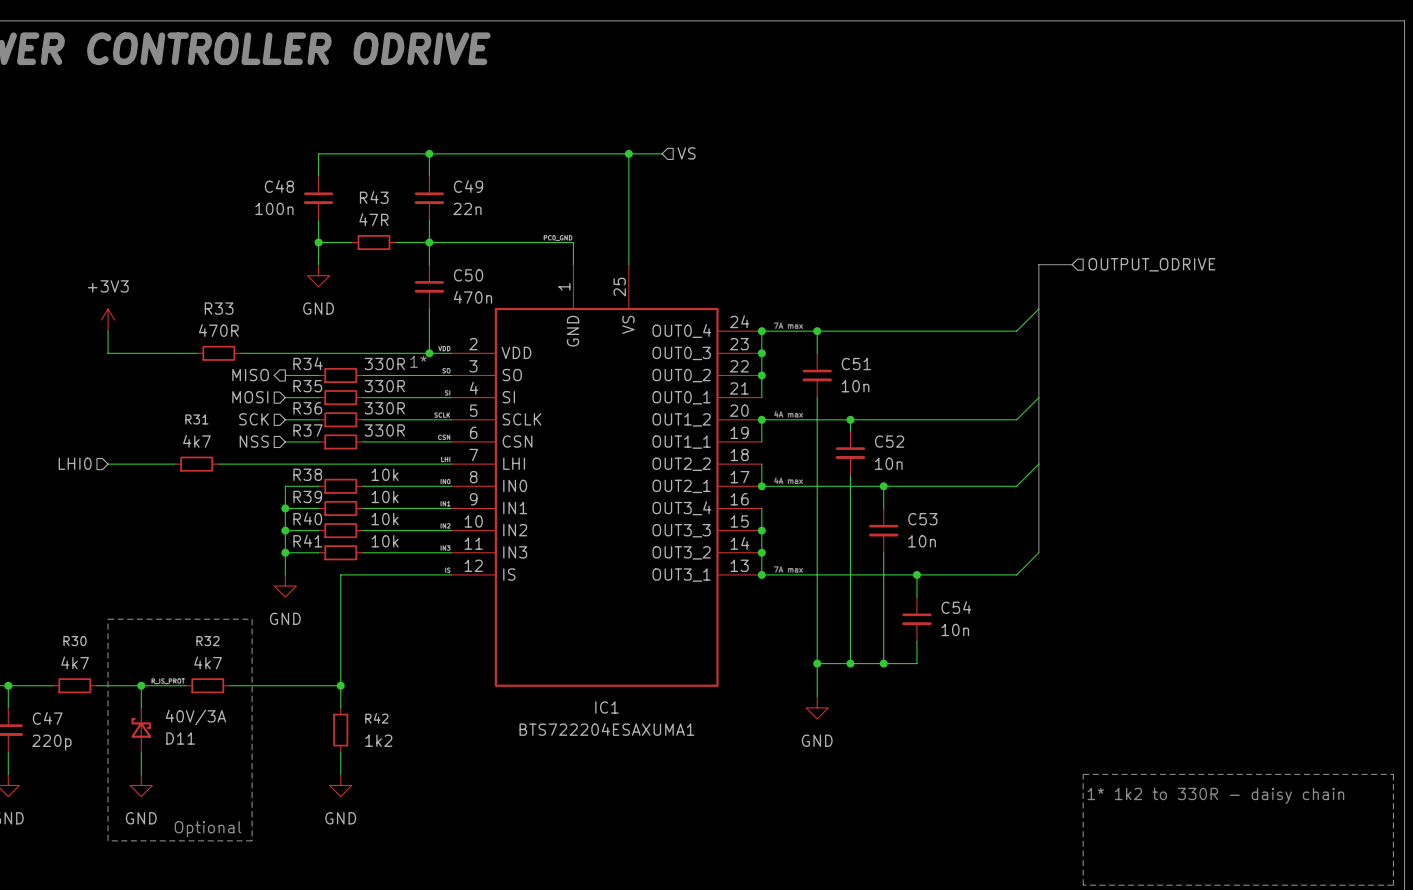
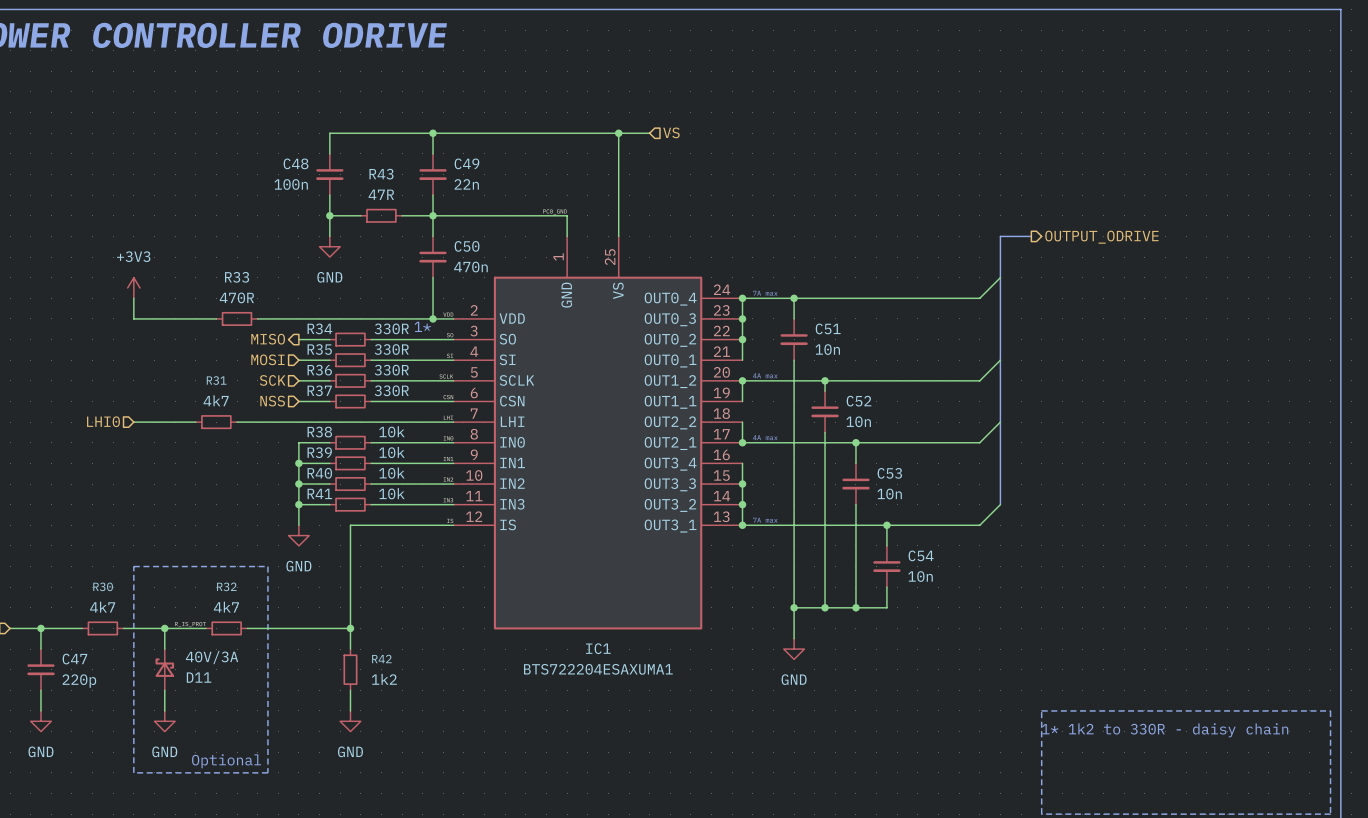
hierarchical label shape: input (1151, 264) -> output (1101, 237)

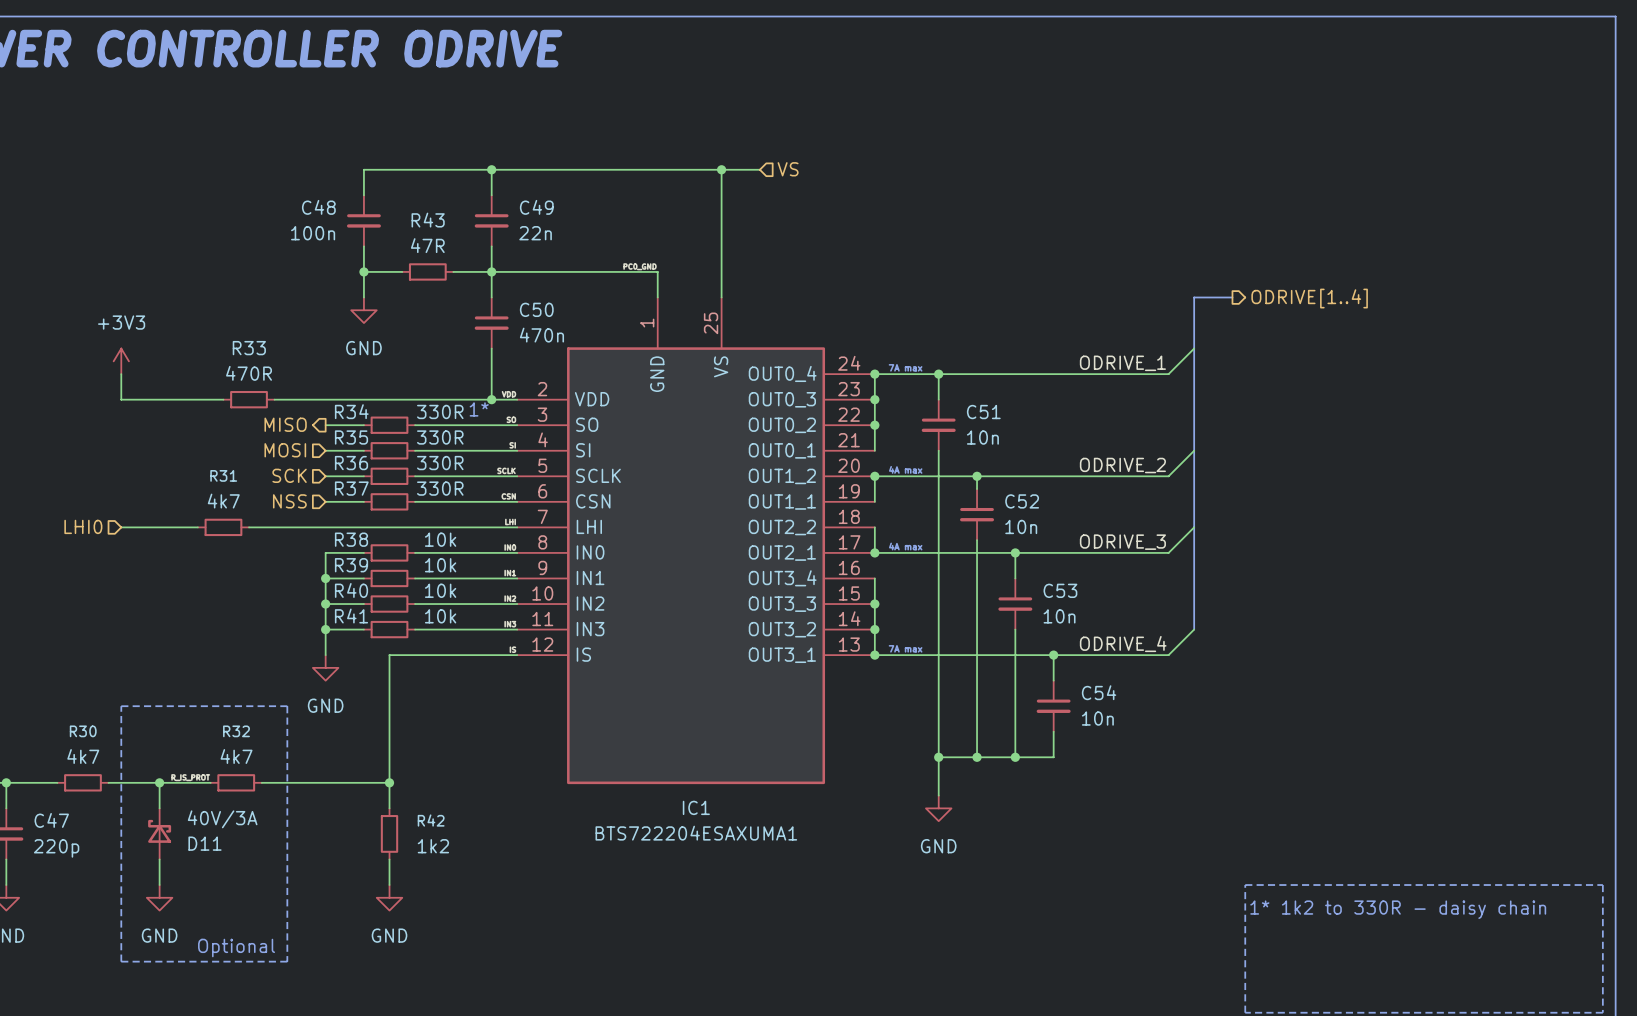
hierarchical label: OUTPUT_ODRIVE (1101, 237) -> ODRIVE[1..4] (1309, 298)
label: none -> ODRIVE_1 (1122, 363)
label: none -> ODRIVE_2 (1122, 465)
label: none -> ODRIVE_3 (1122, 542)
label: none -> ODRIVE_4 (1123, 644)

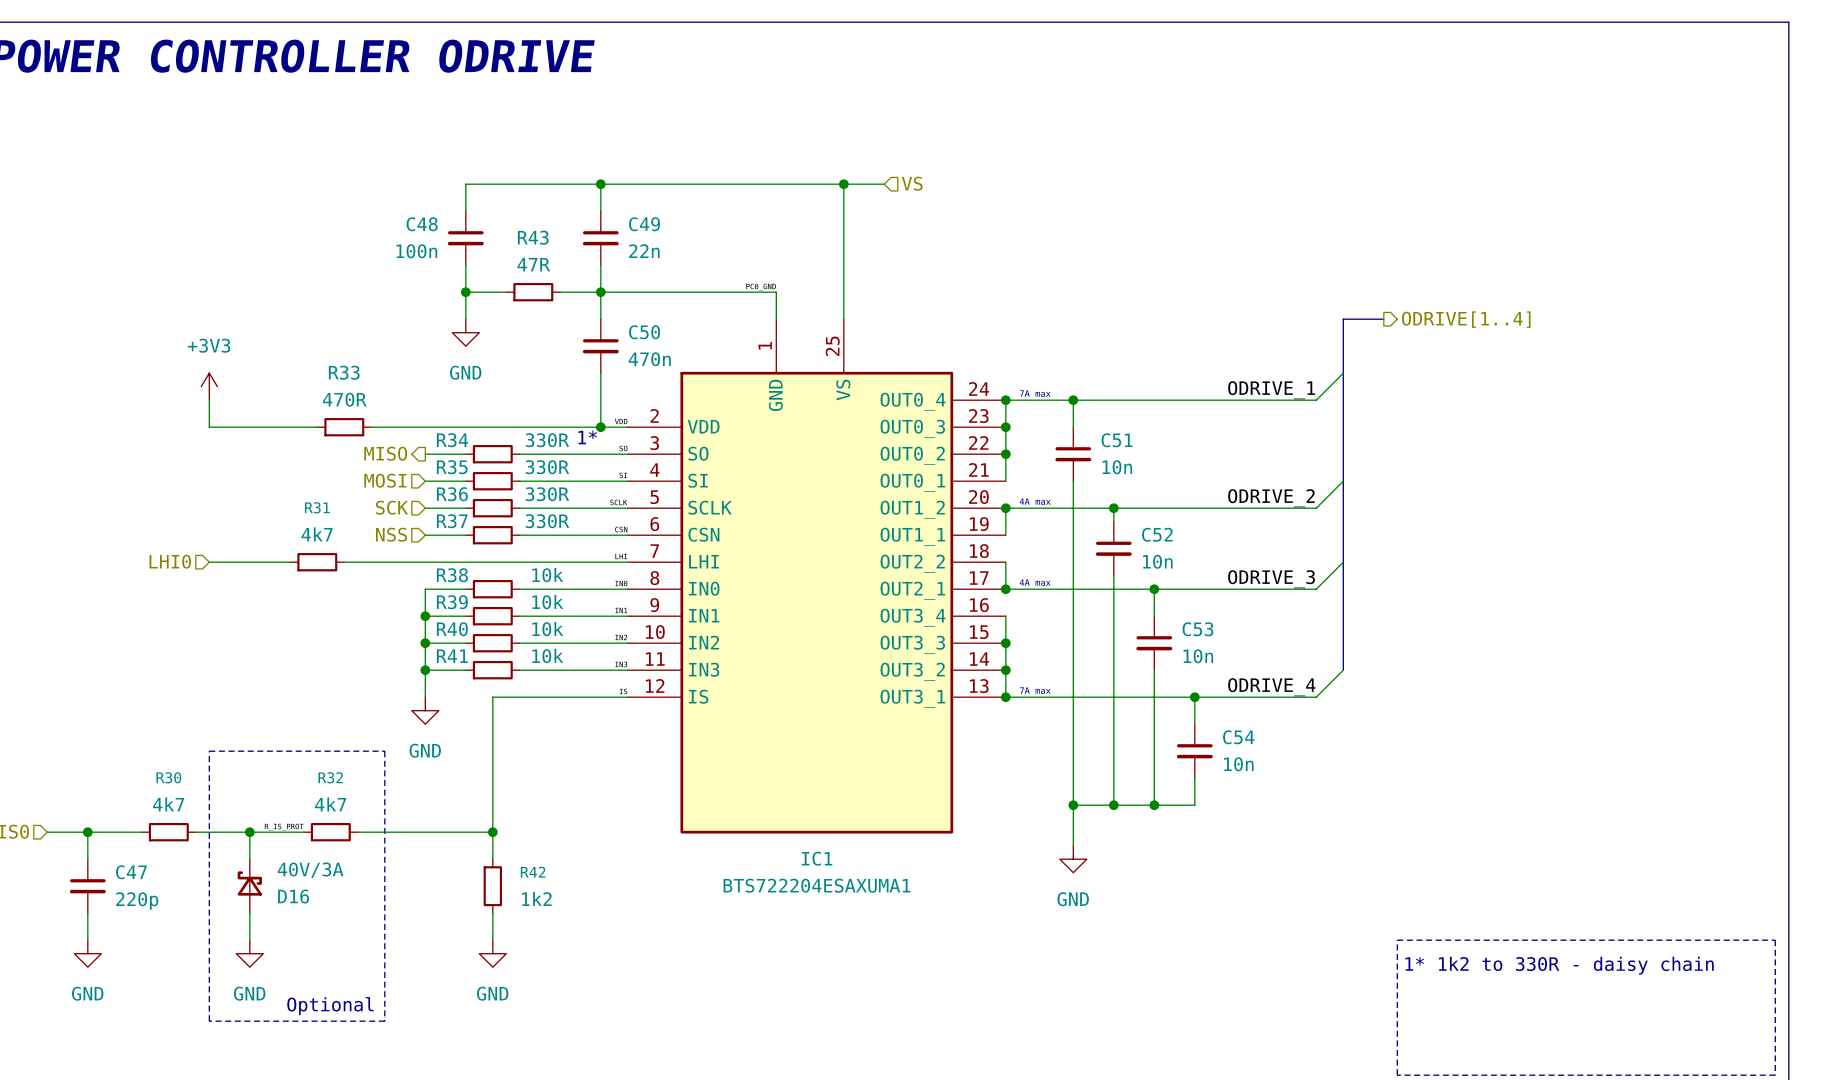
D11 name: D11 (205, 843) -> D16 (293, 896)

